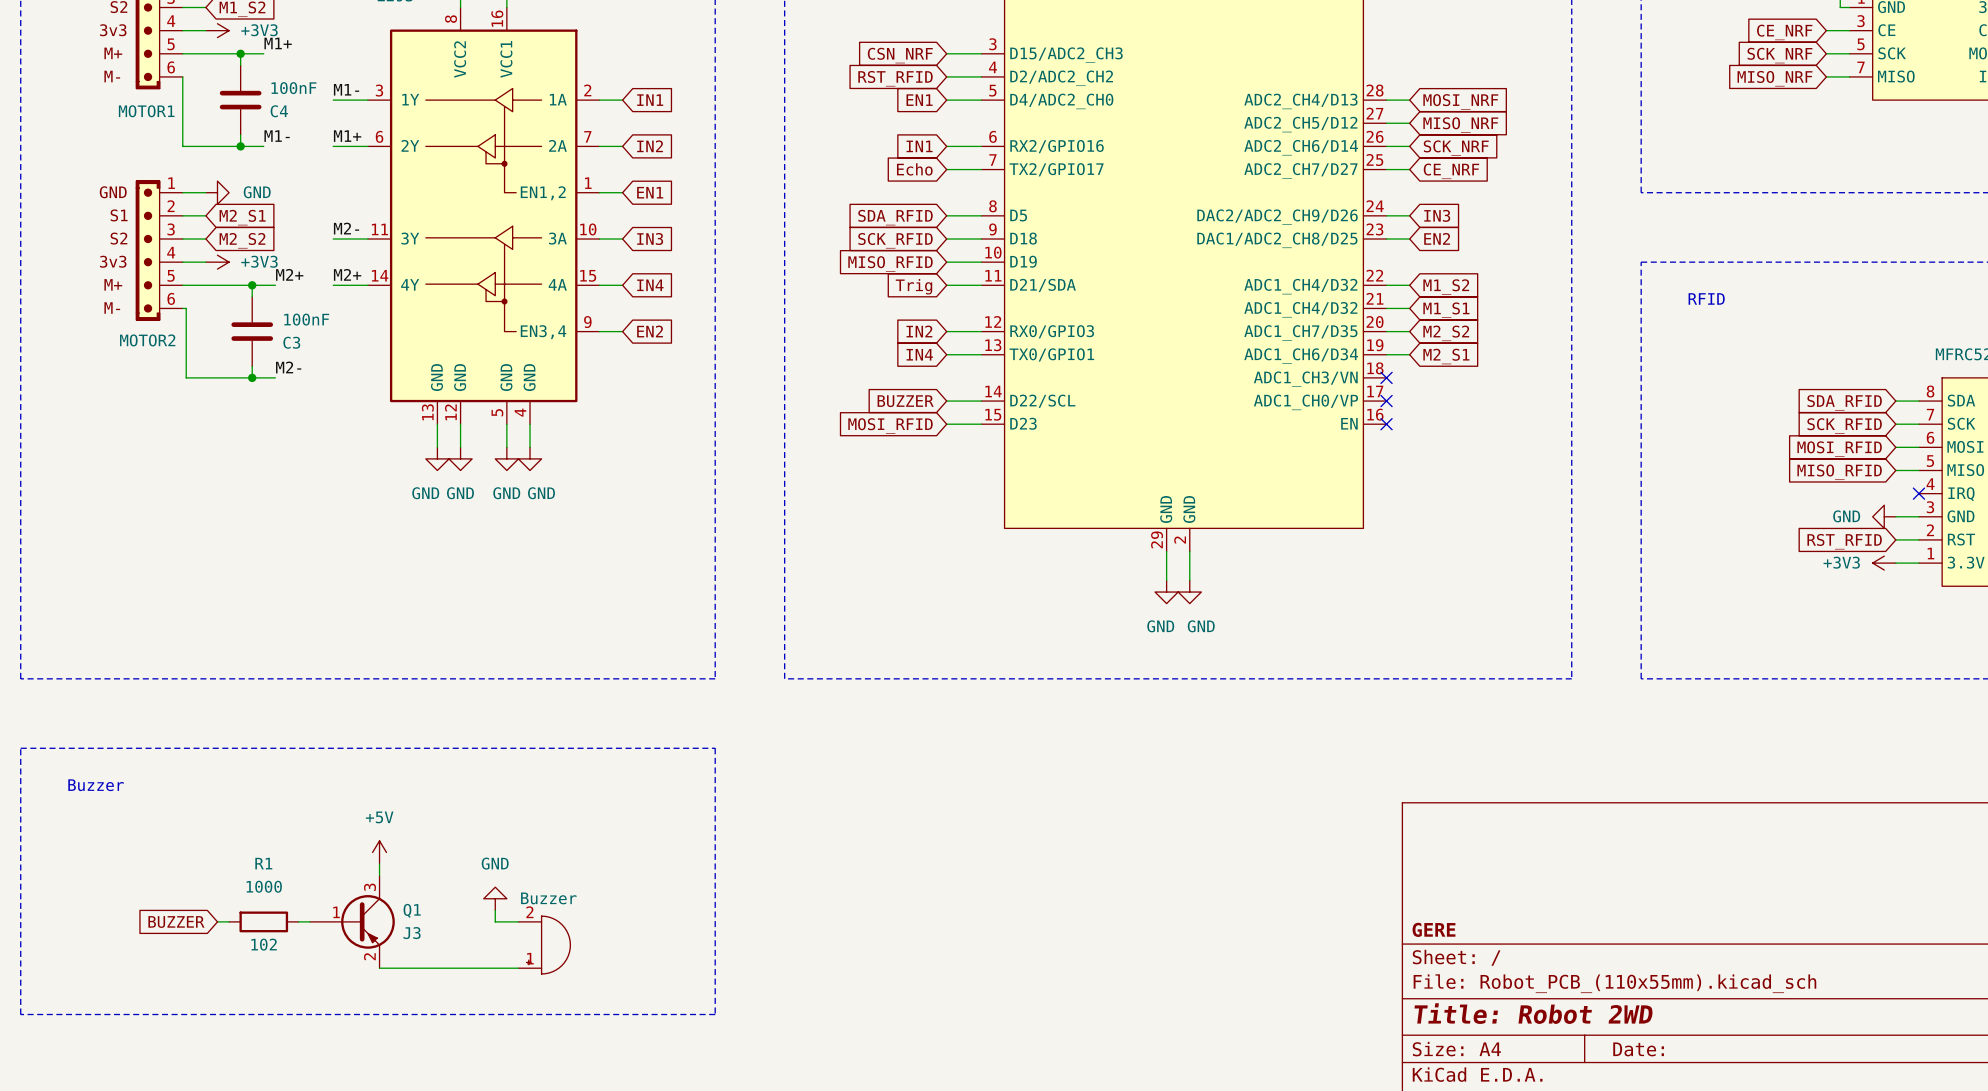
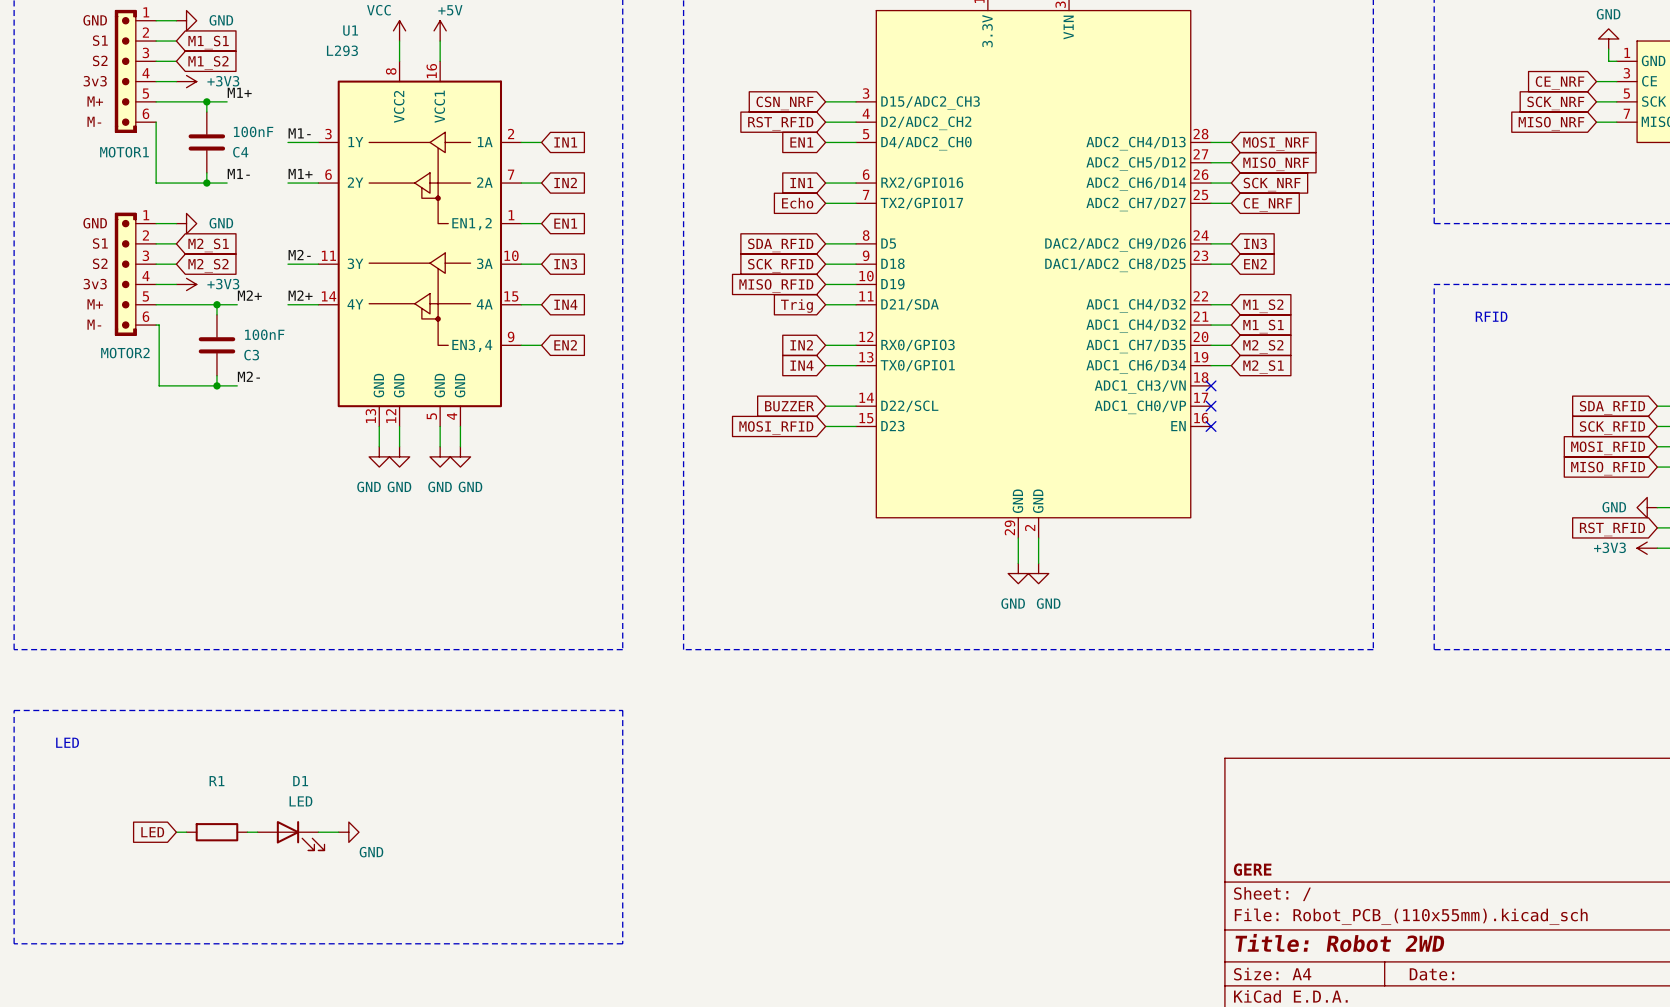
text: Buzzer (96, 785) -> LED (67, 742)
power symbol: +5V (379, 852) -> none
power symbol text position: GND (495, 863) -> GND (371, 852)
wire: (379, 864) (379, 875) -> none
R1 value: 1000 (264, 886) -> none
global label: none -> LED (152, 832)
wire: none -> (318, 832) (338, 832)
D1: none -> LED (291, 835)
power symbol rotation: 0° (495, 898) -> 90° clockwise (348, 832)
power symbol position: GND (495, 898) -> GND (348, 832)
wire: (495, 910) (495, 921) (518, 921) -> none
wire: (217, 921) (229, 921) -> (176, 832) (186, 832)
R1 position: (263, 921) -> (216, 832)
wire: (298, 921) (310, 921) -> (247, 832) (257, 832)
Q1: J3 (352, 921) -> none
global label: BUZZER (176, 922) -> none
R1 text: 102 (264, 944) -> none
part: Buzzer (544, 945) -> none
wire: (379, 968) (518, 968) -> none

